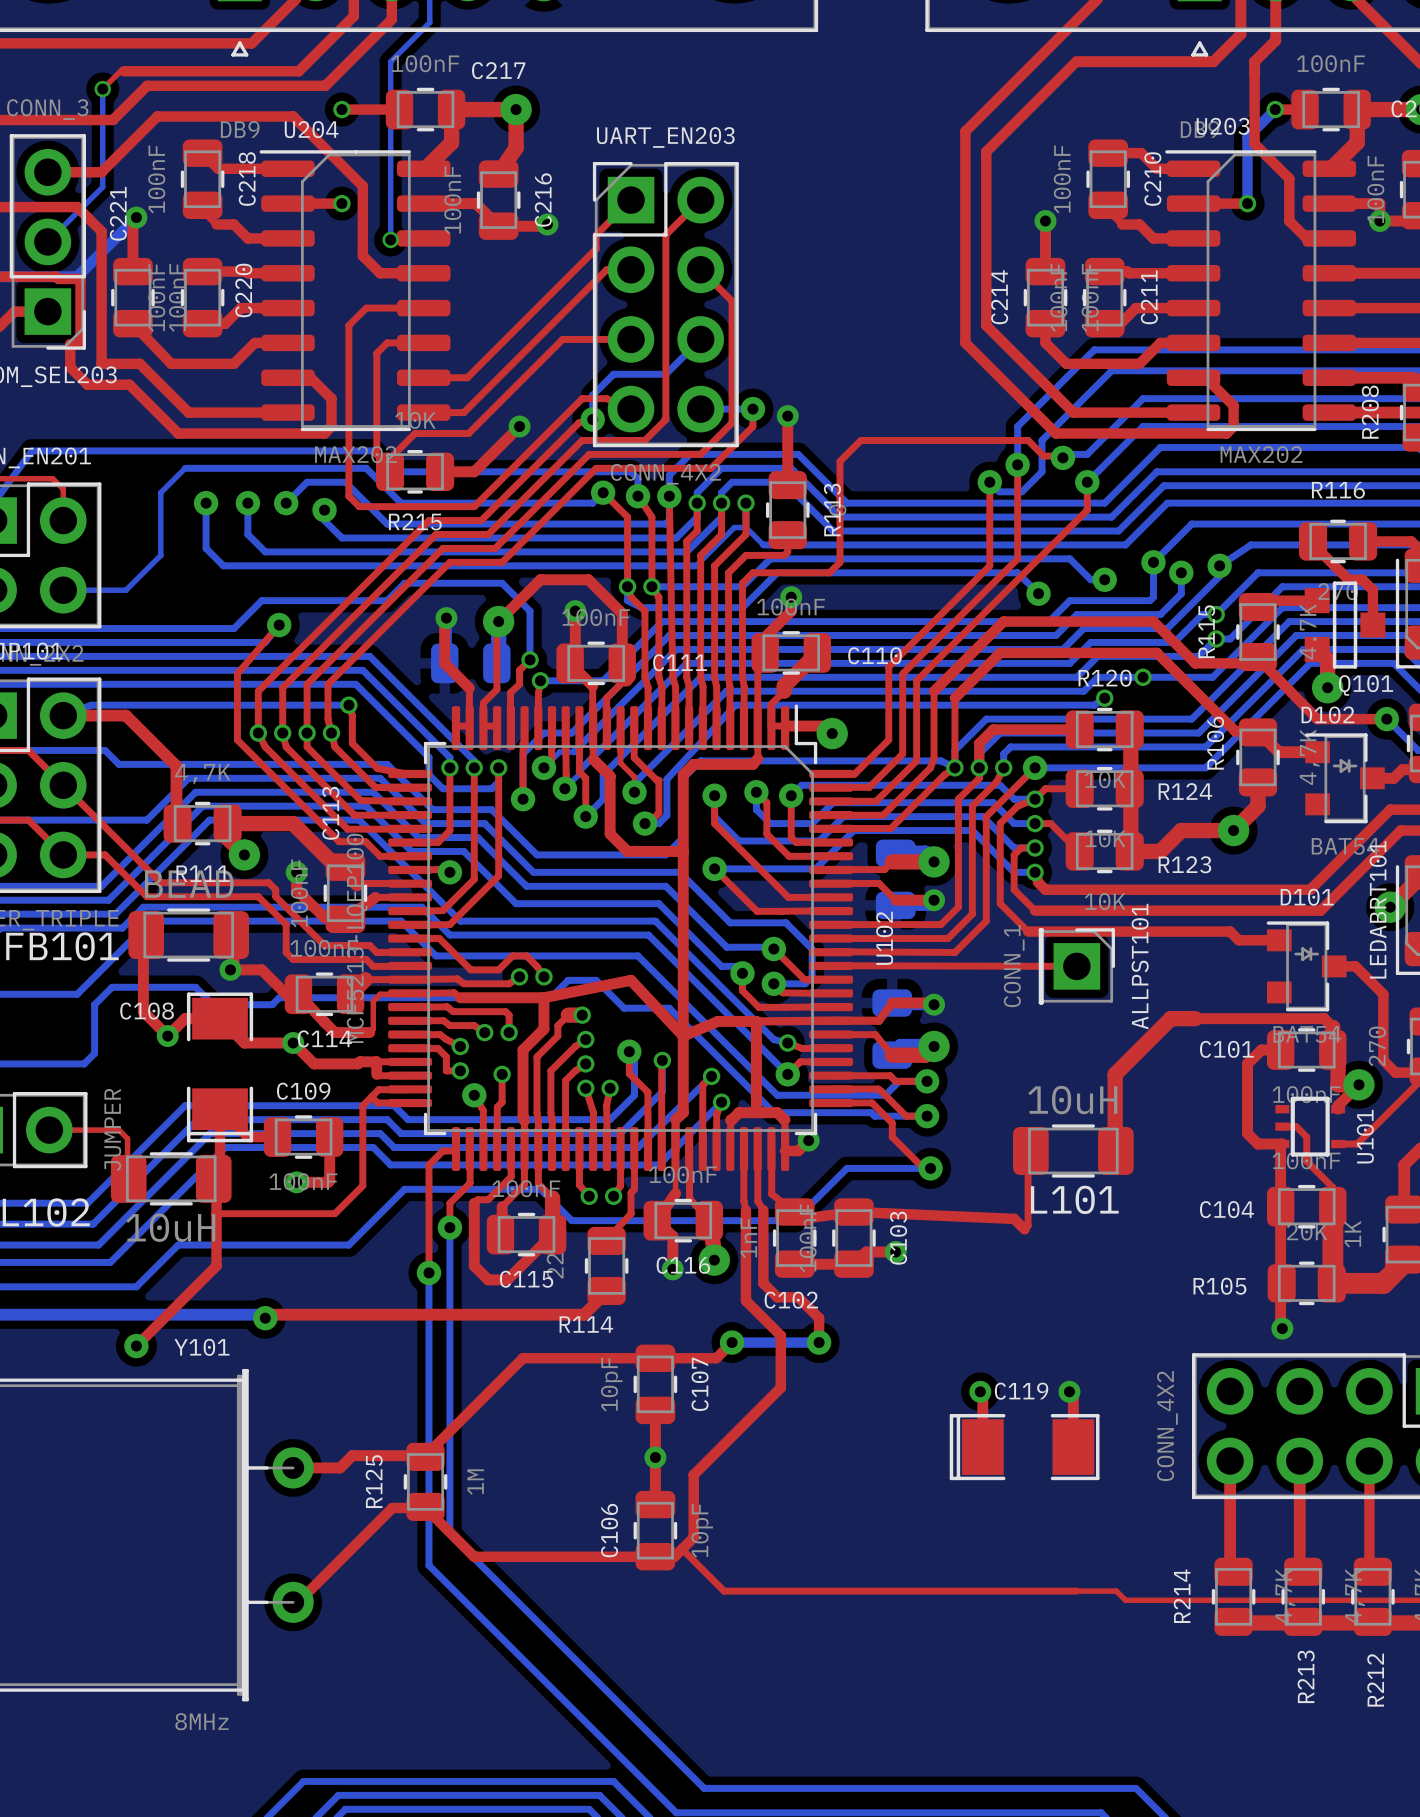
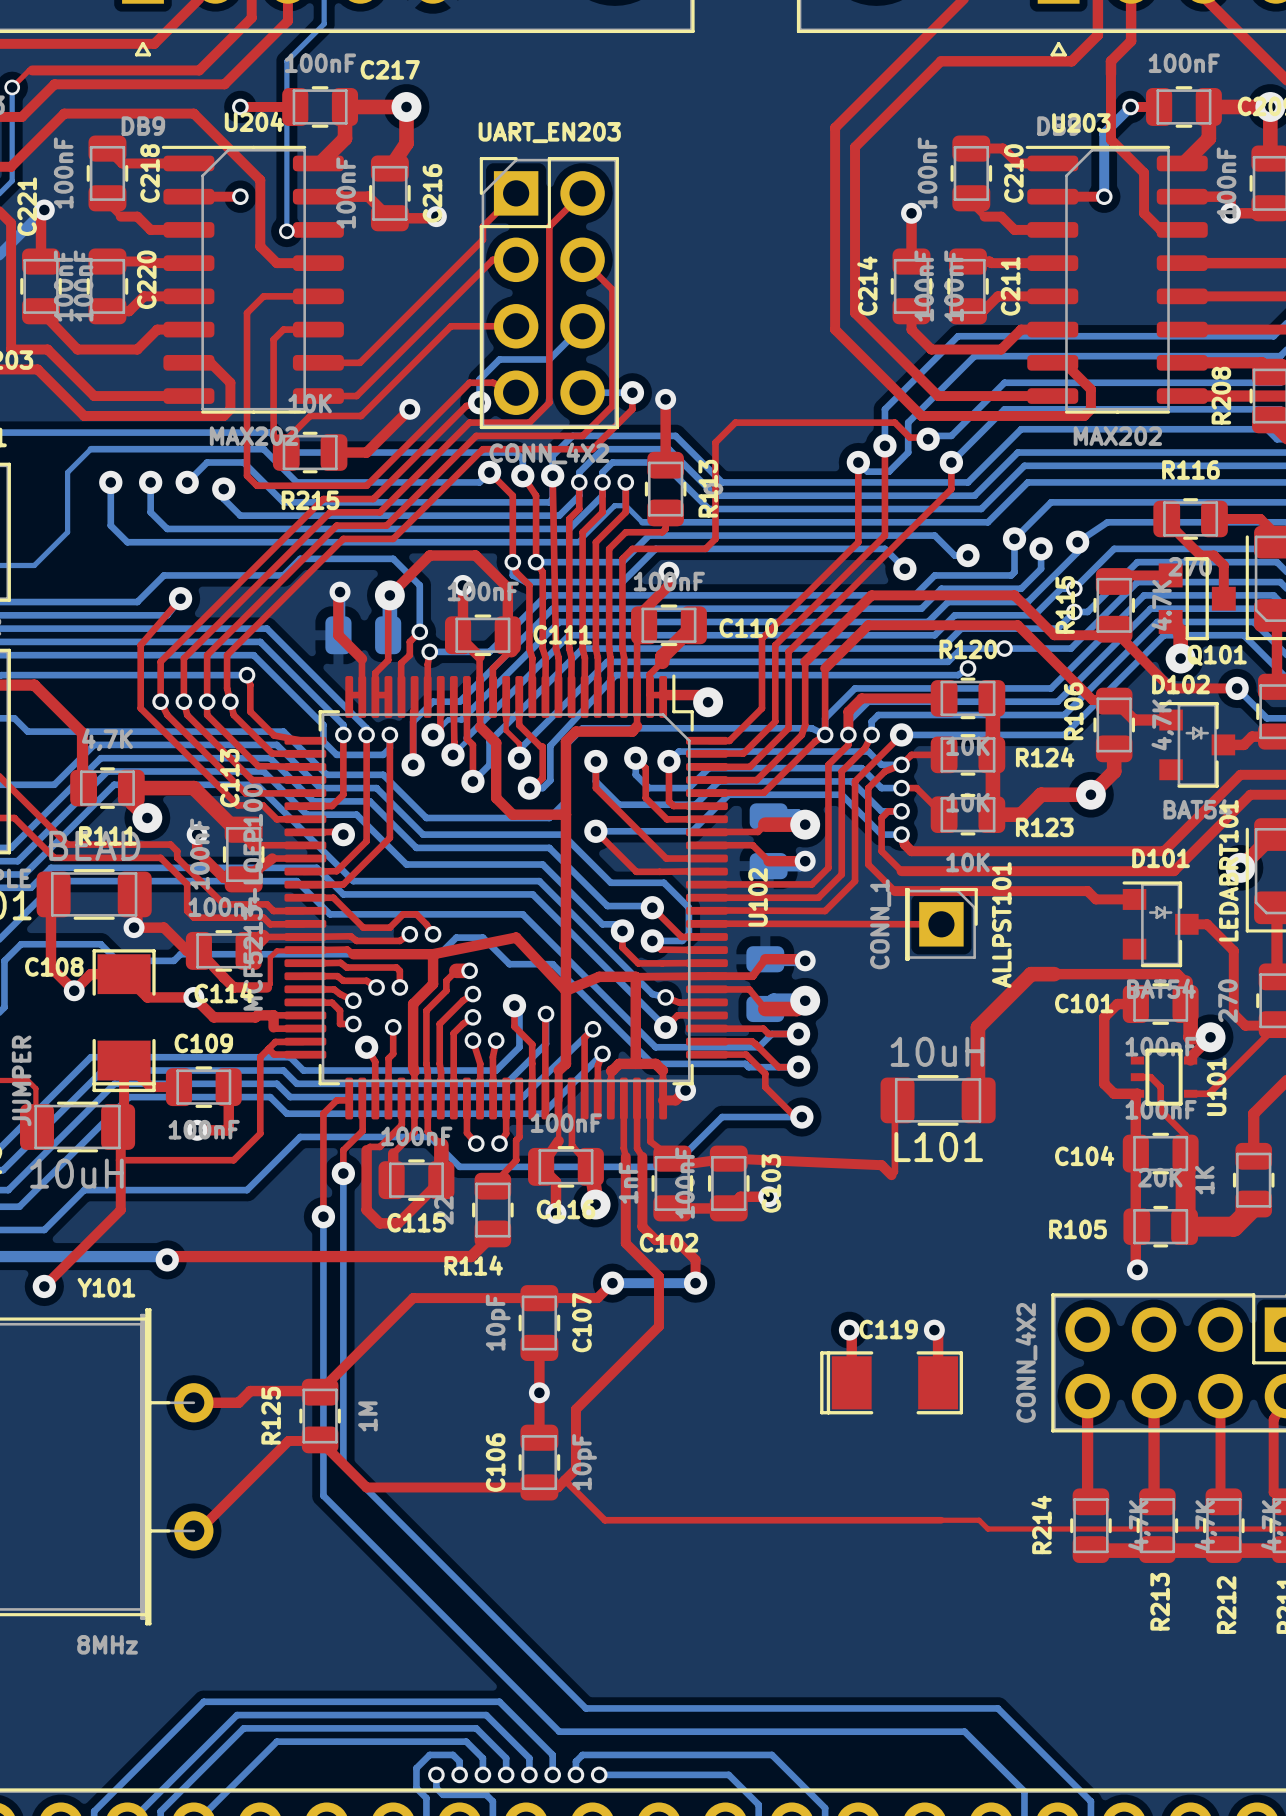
U204 name position: U204 (311, 129) -> U204 (254, 121)

